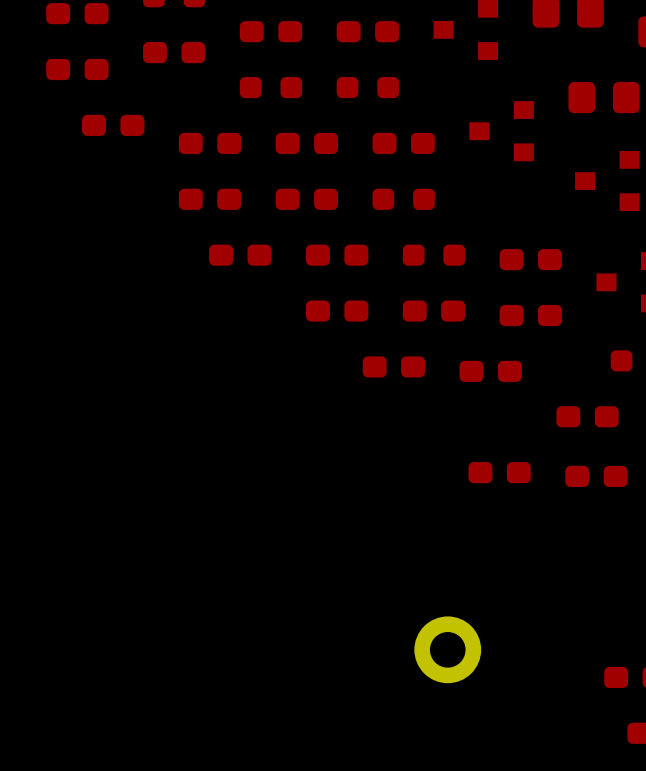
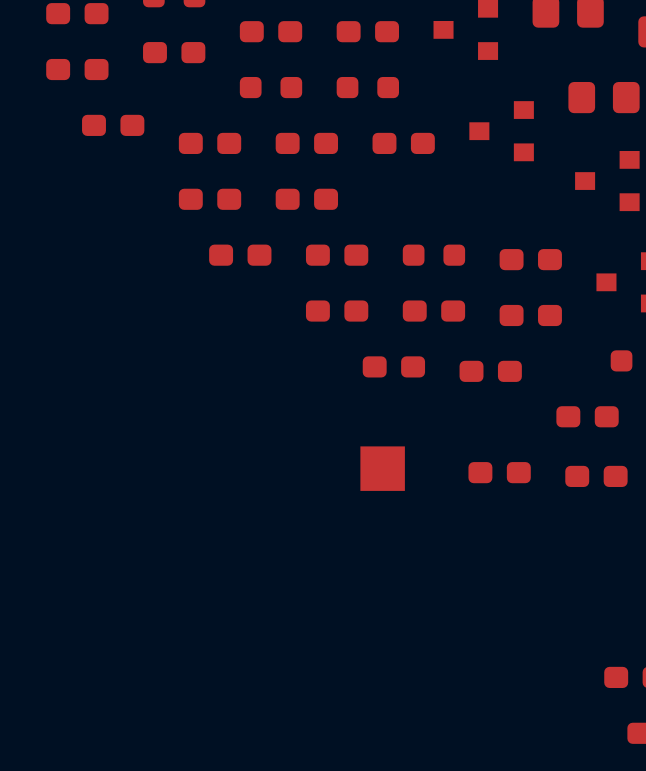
part: (403, 199) -> none
part: none -> (382, 468)
part: (447, 649) -> none

